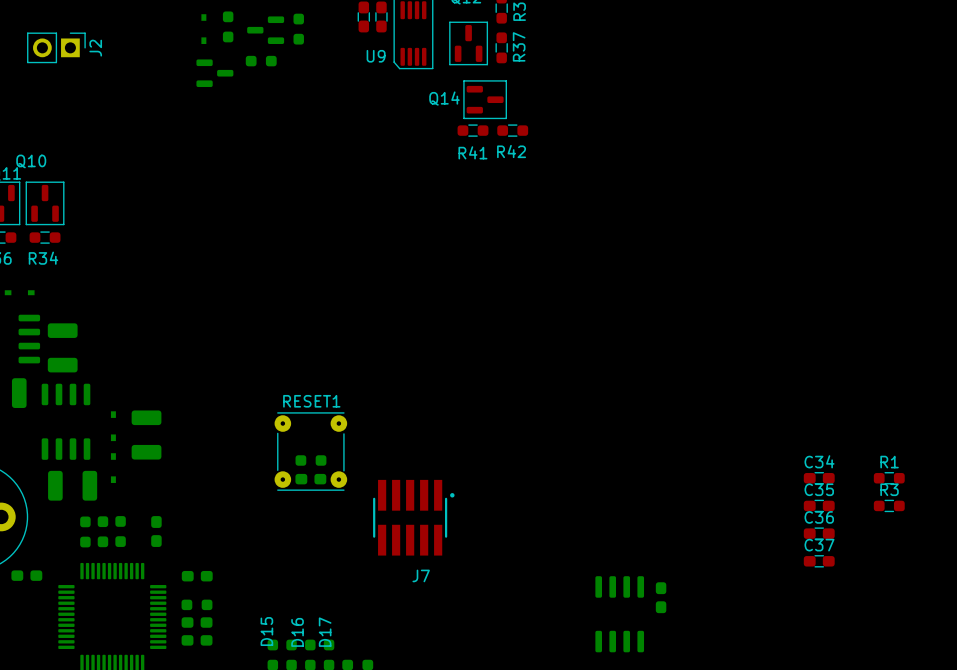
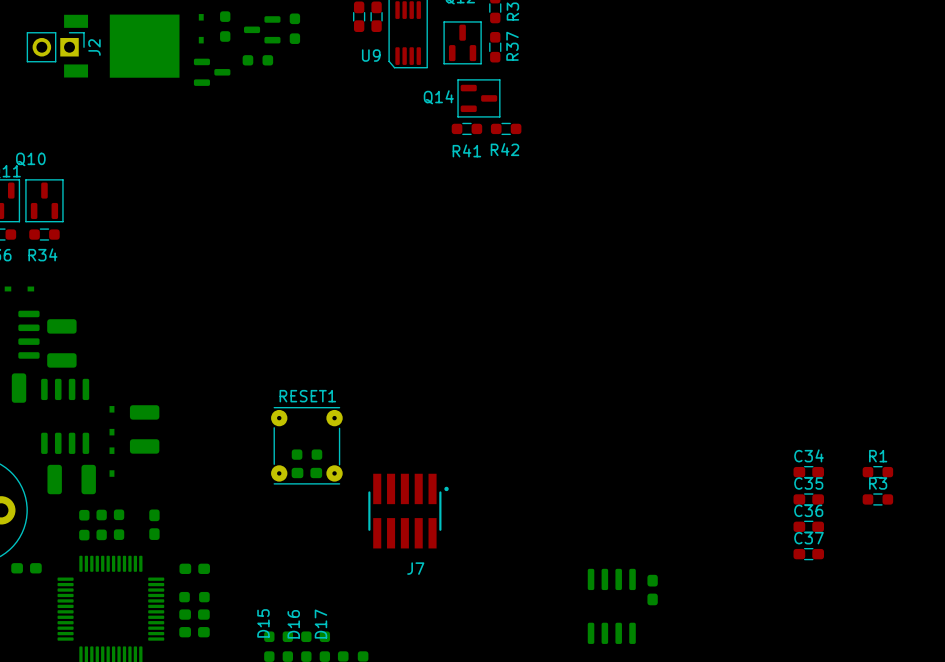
part: none -> (121, 46)

